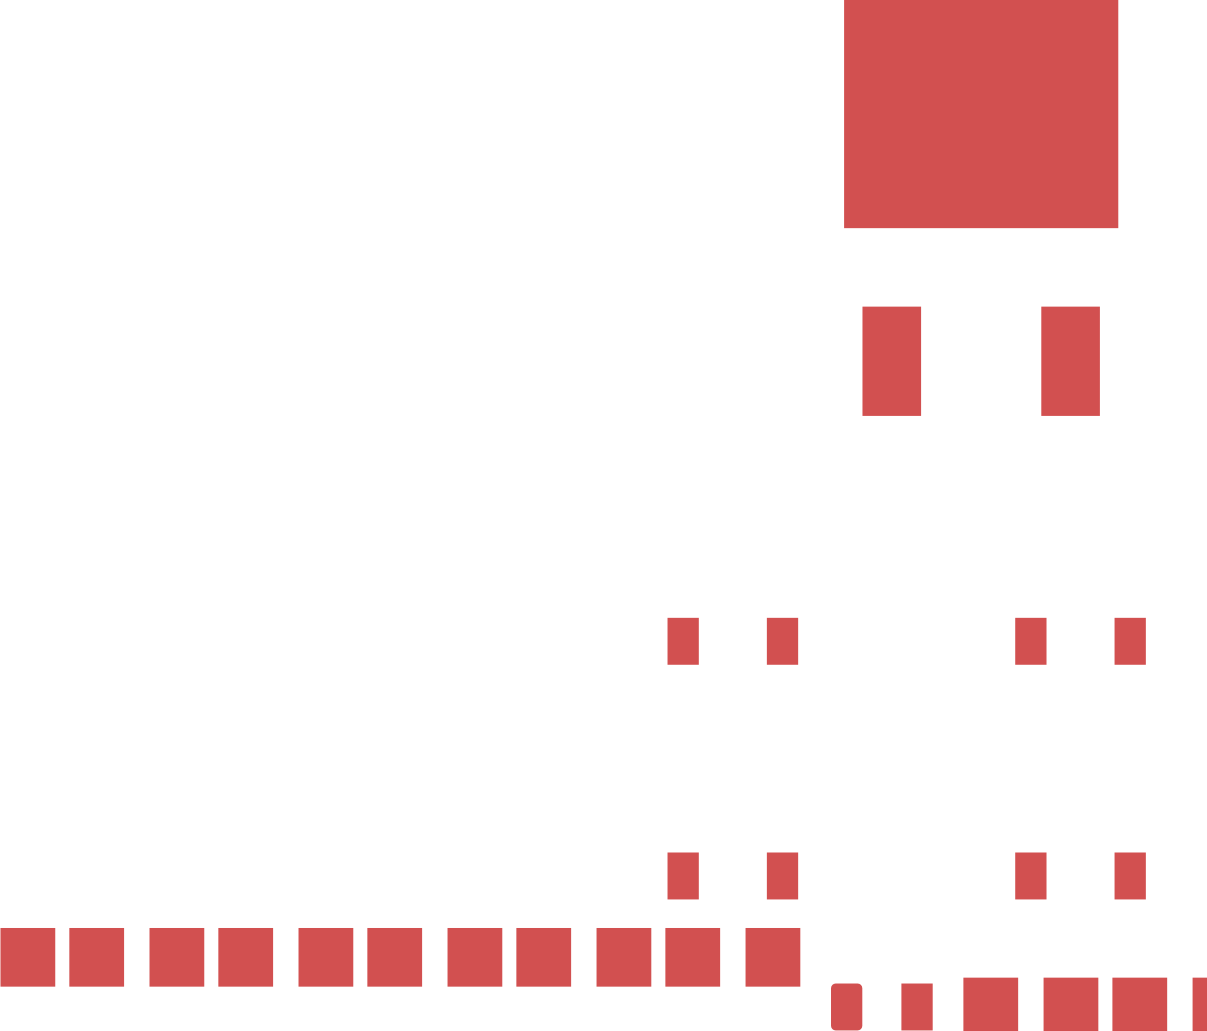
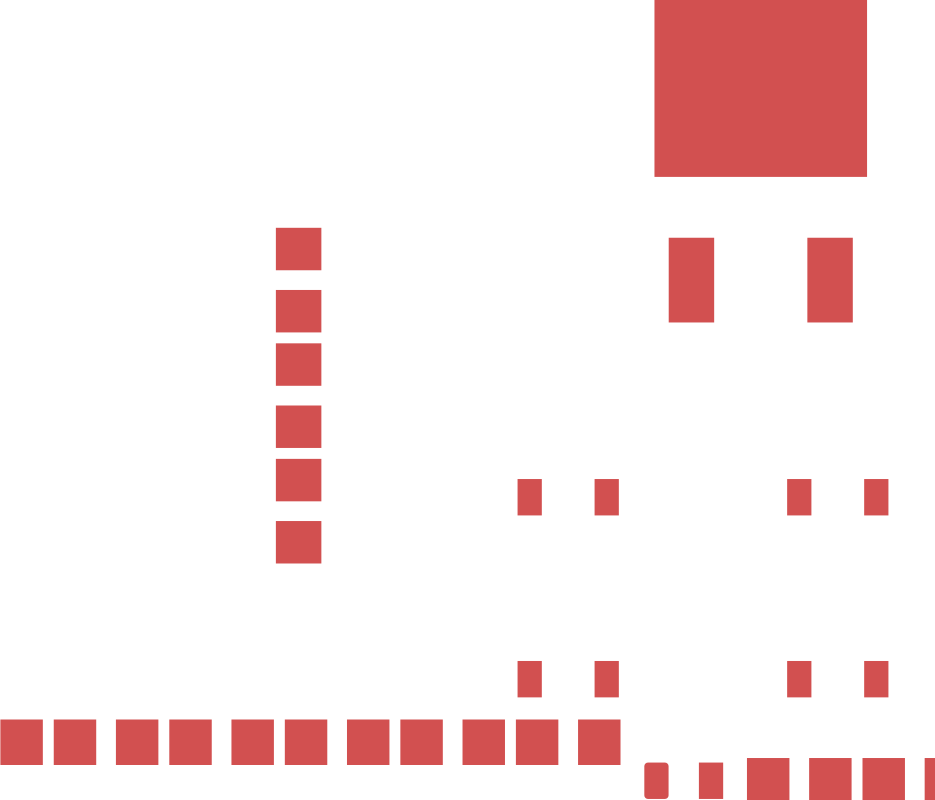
part: none -> (298, 280)
part: none -> (298, 395)
part: none -> (298, 511)

